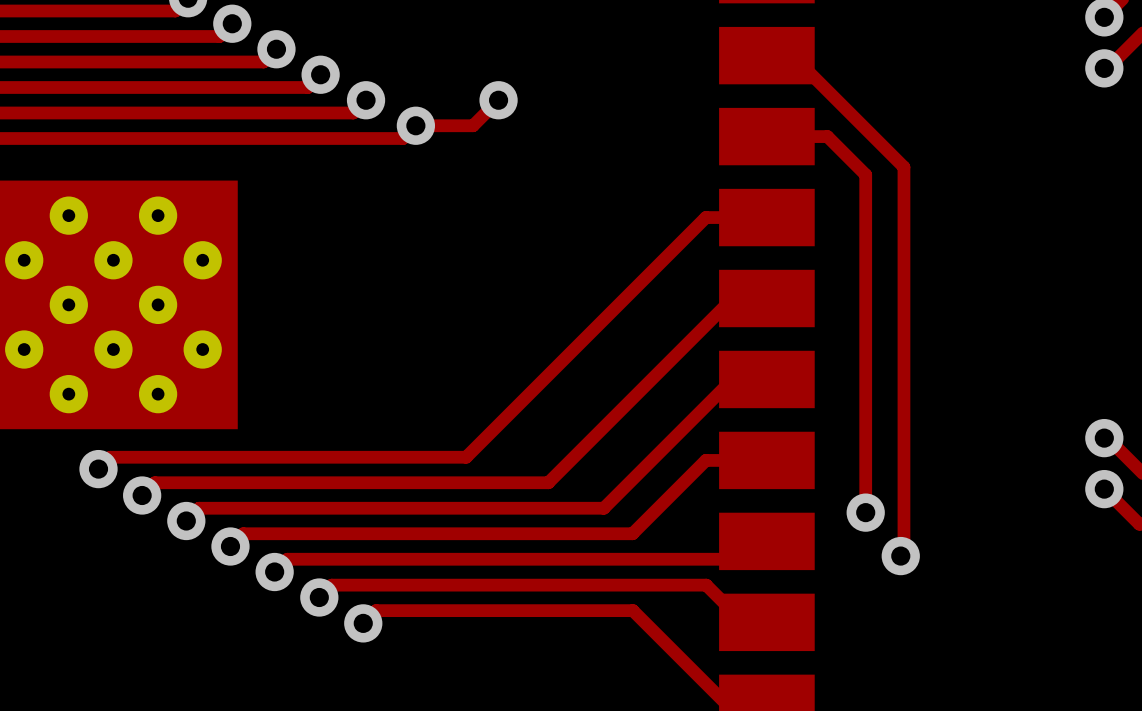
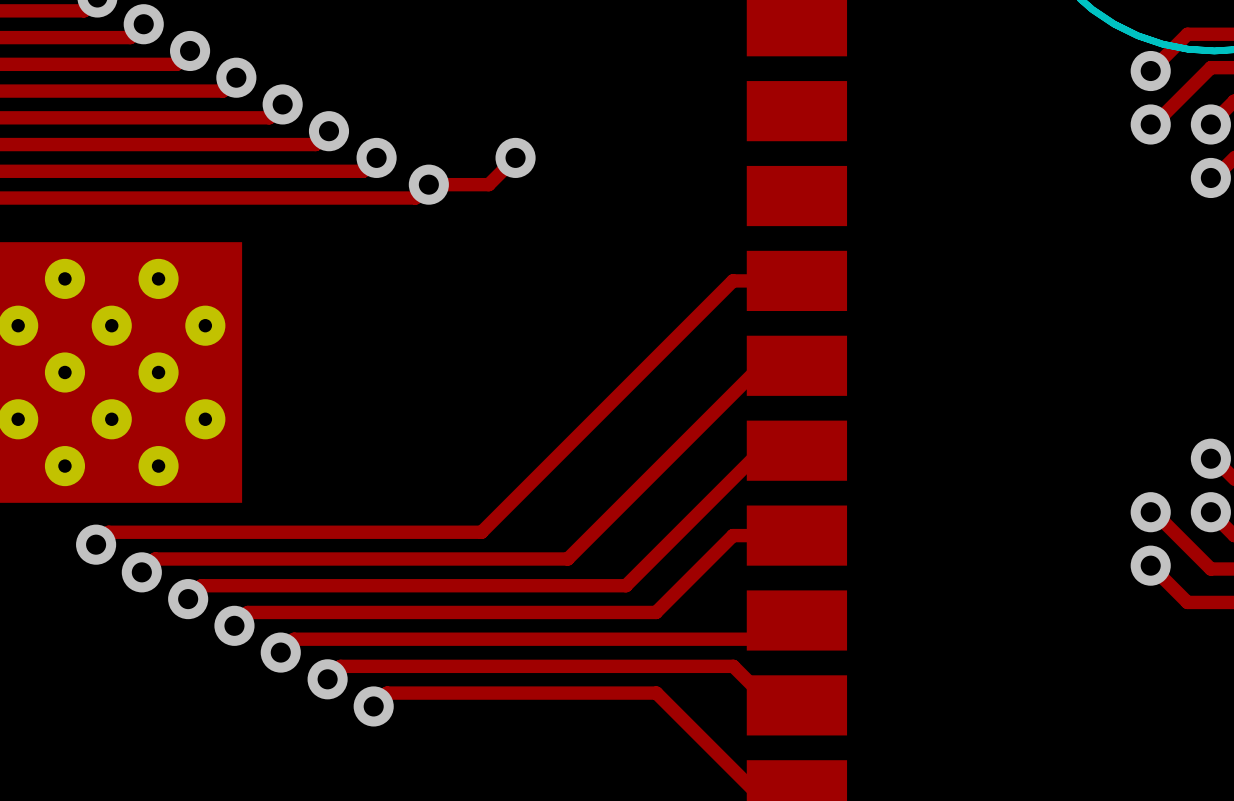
track: (766, 55) (792, 55) (903, 167) (903, 552) (900, 556) -> none
track: (766, 136) (827, 136) (865, 174) (865, 512) -> none
via: (865, 512) -> none
via: (900, 556) -> none

